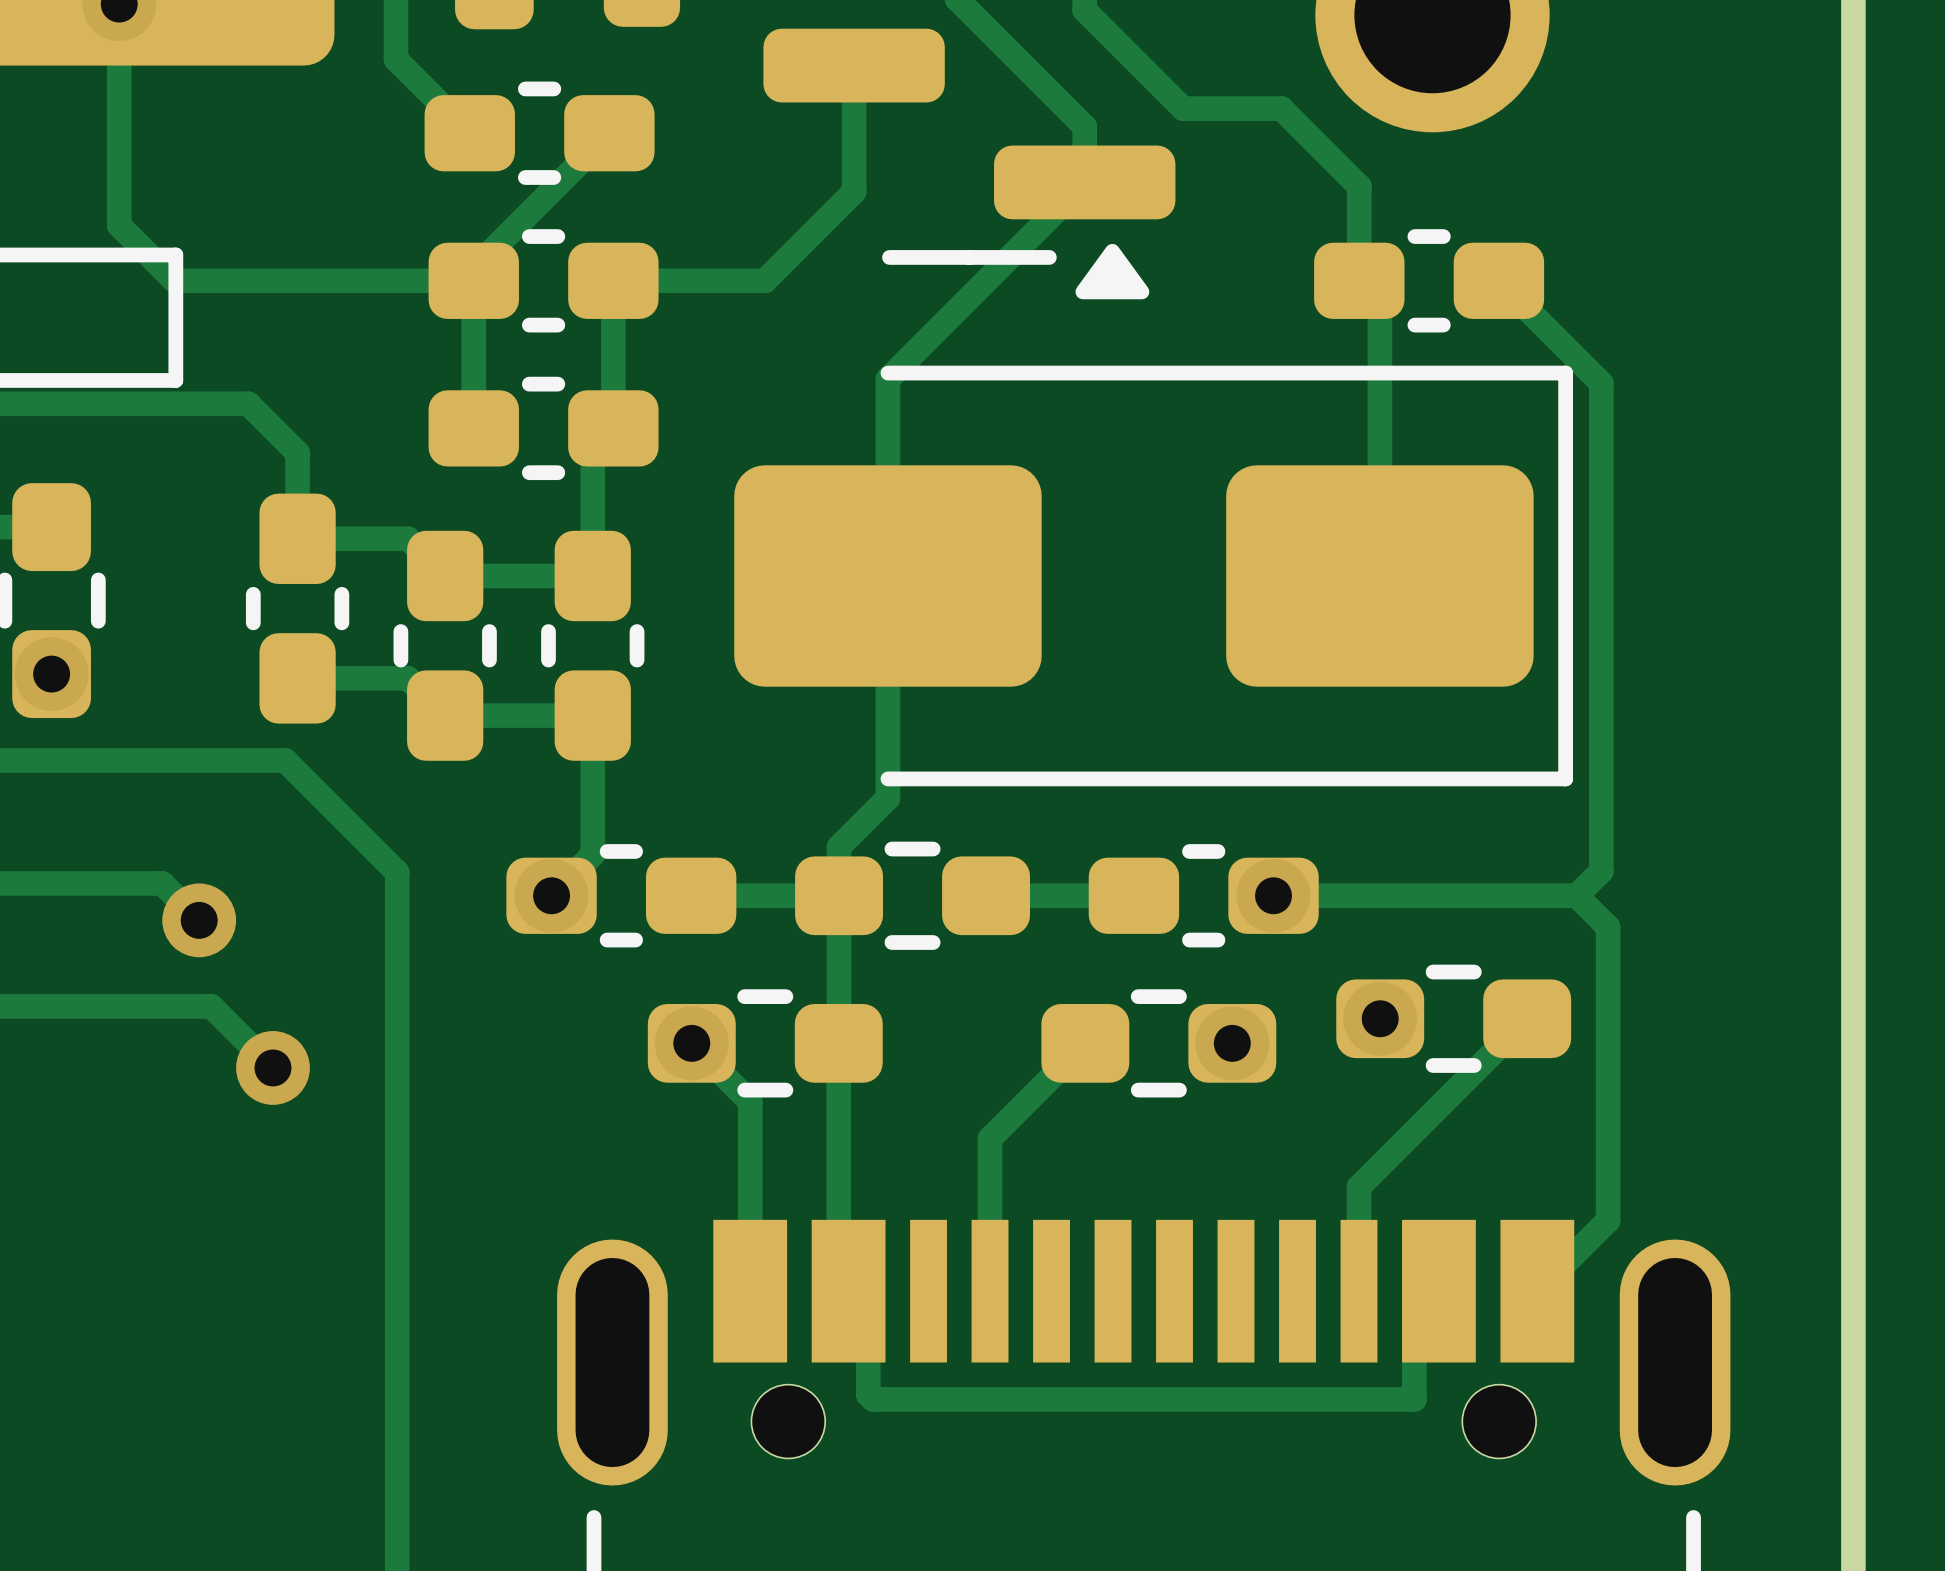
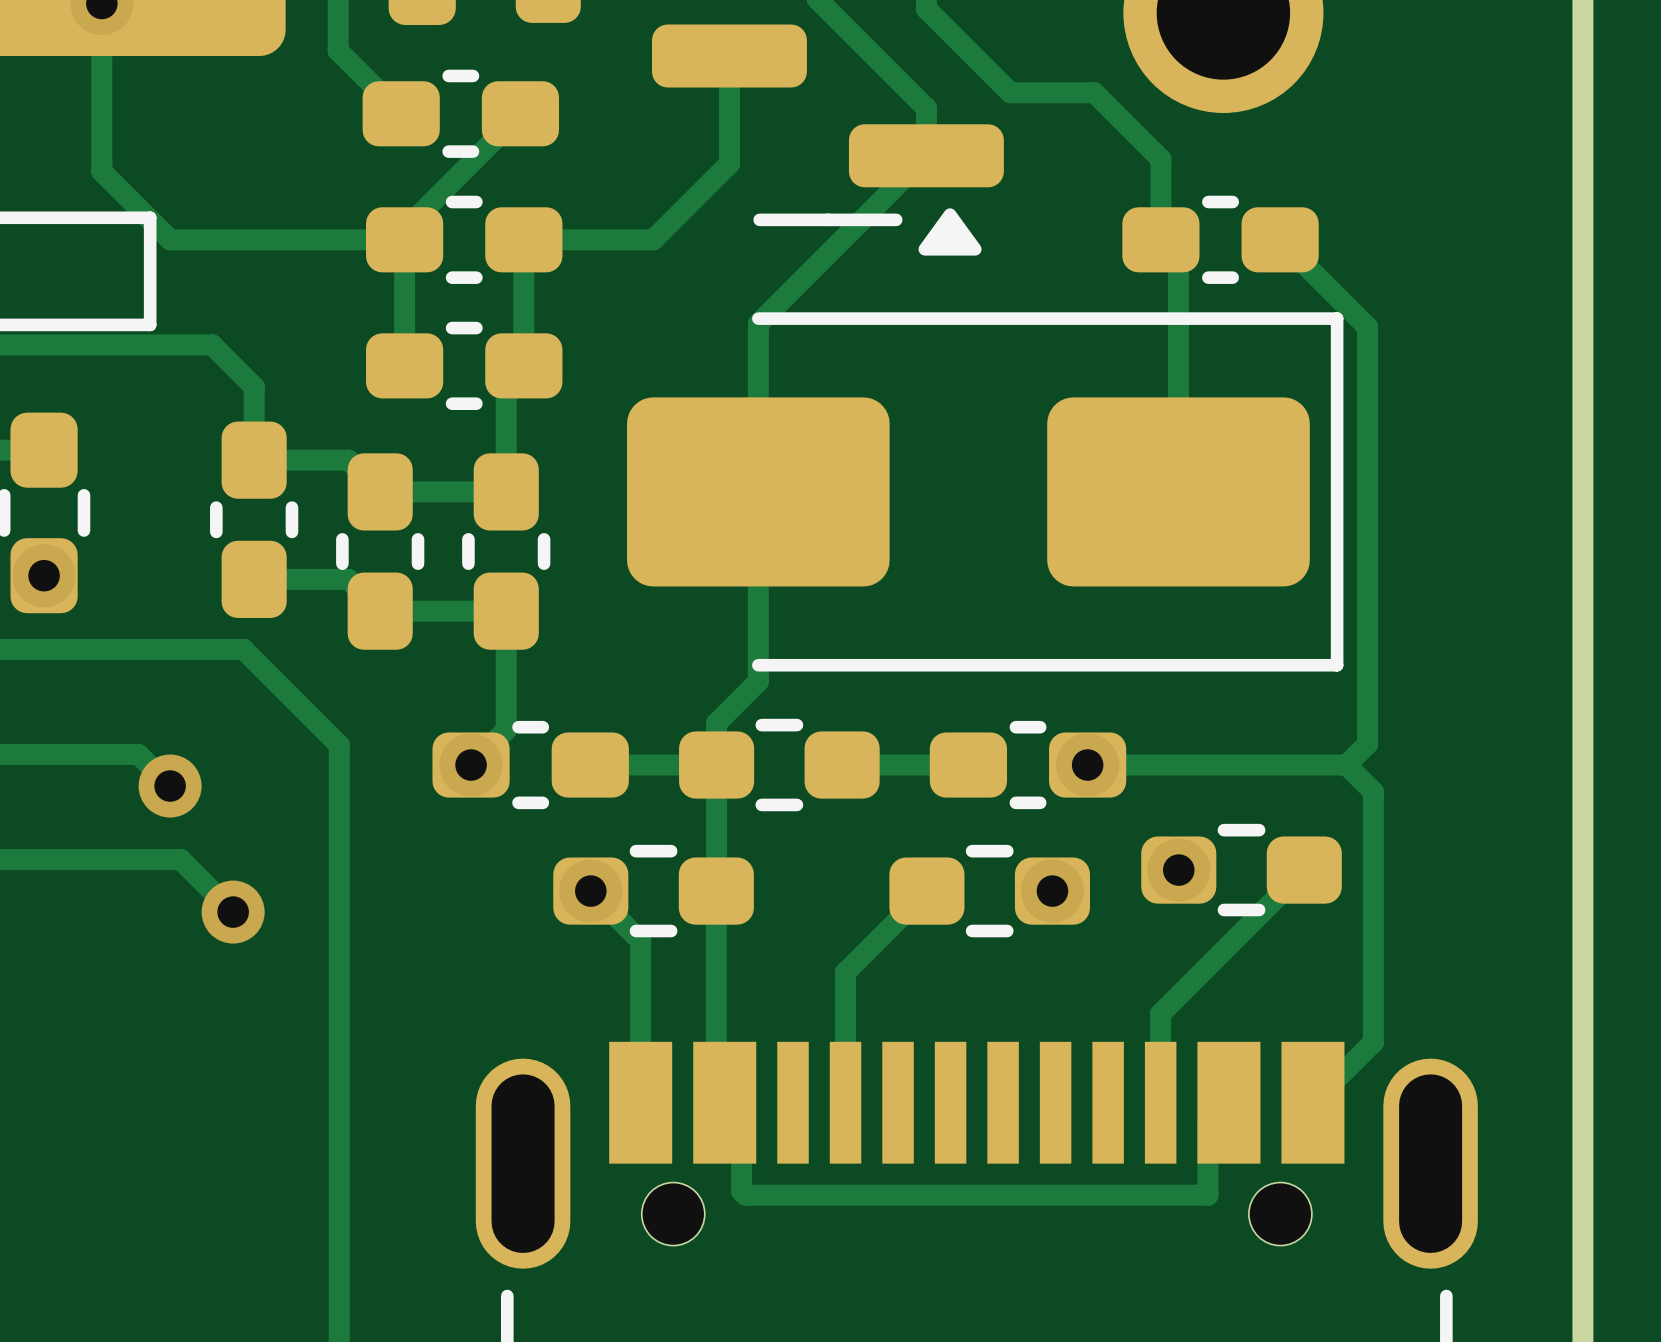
track: (119, 200) (119, 225) (174, 280) (199, 280) -> (101, 171) (170, 239)

